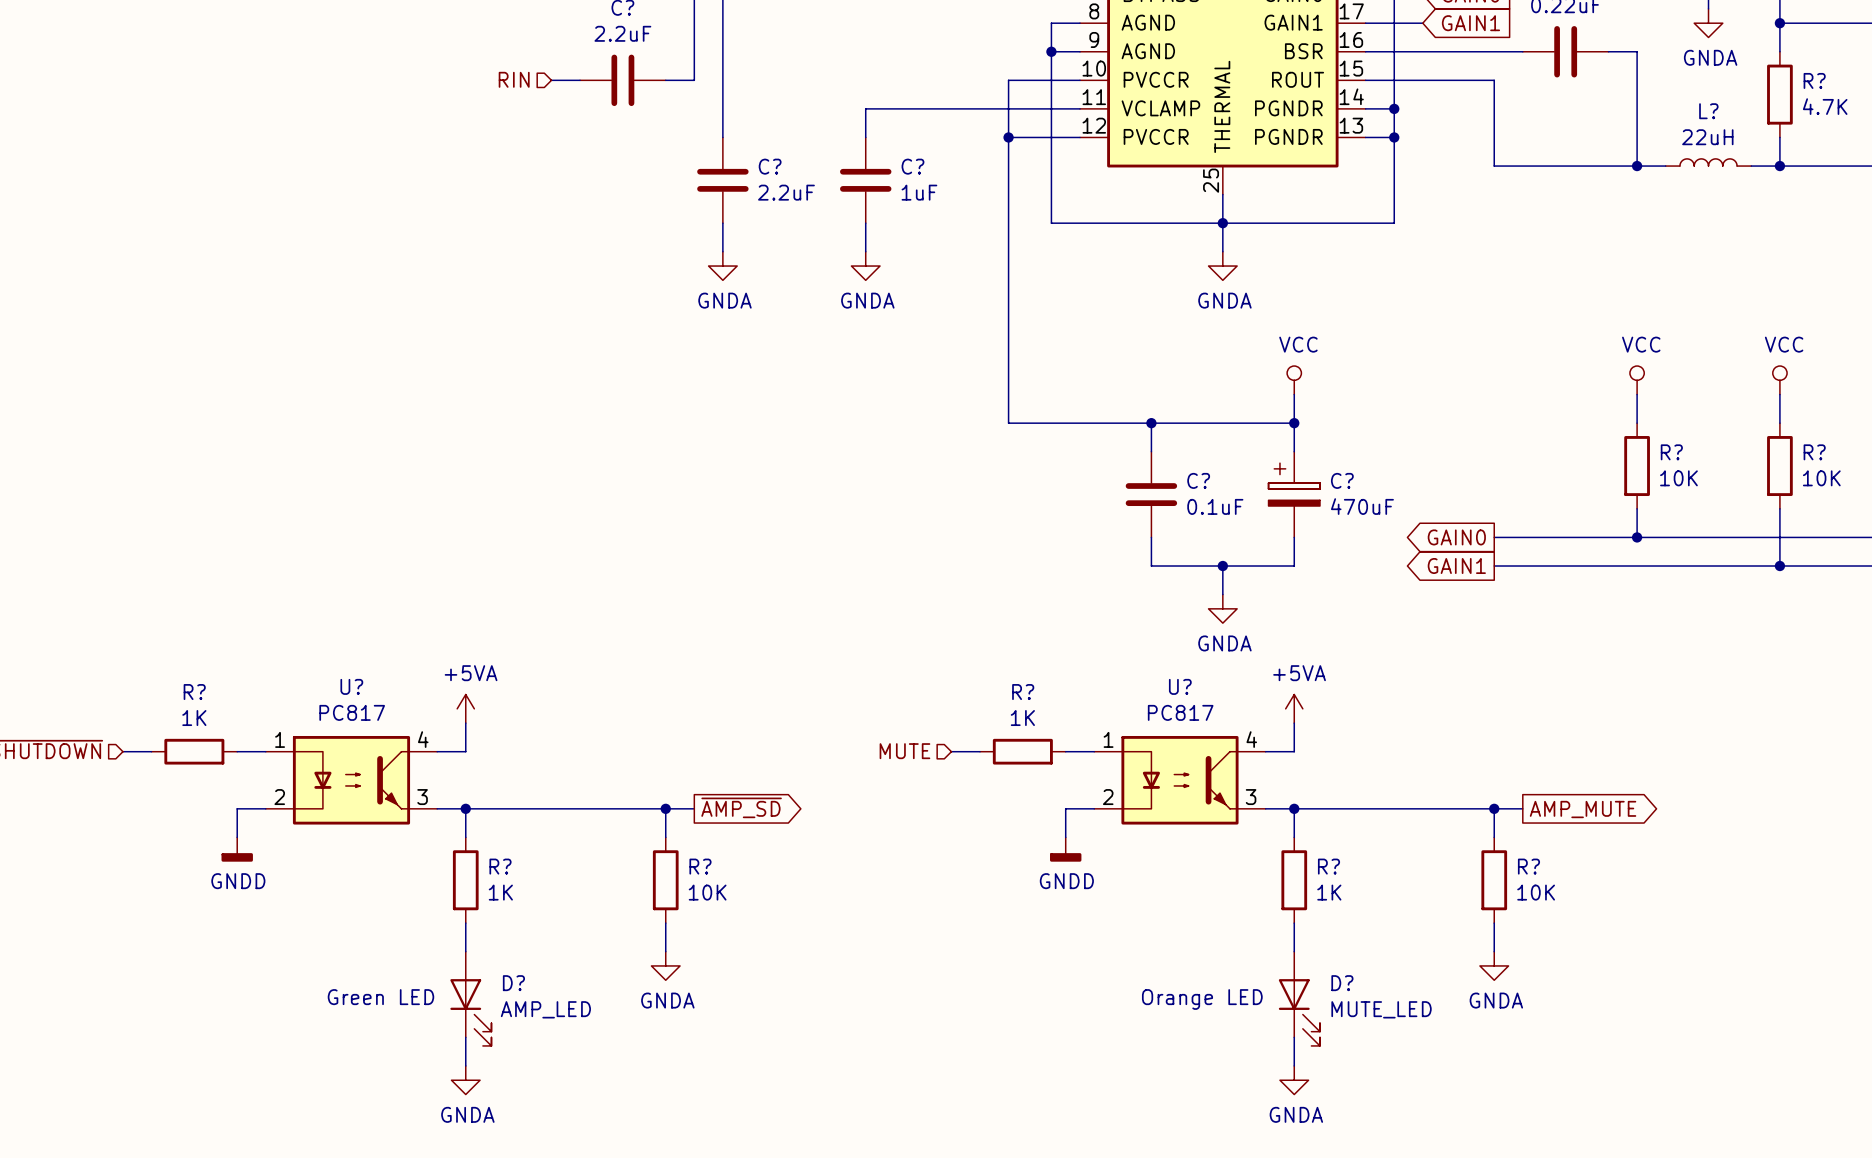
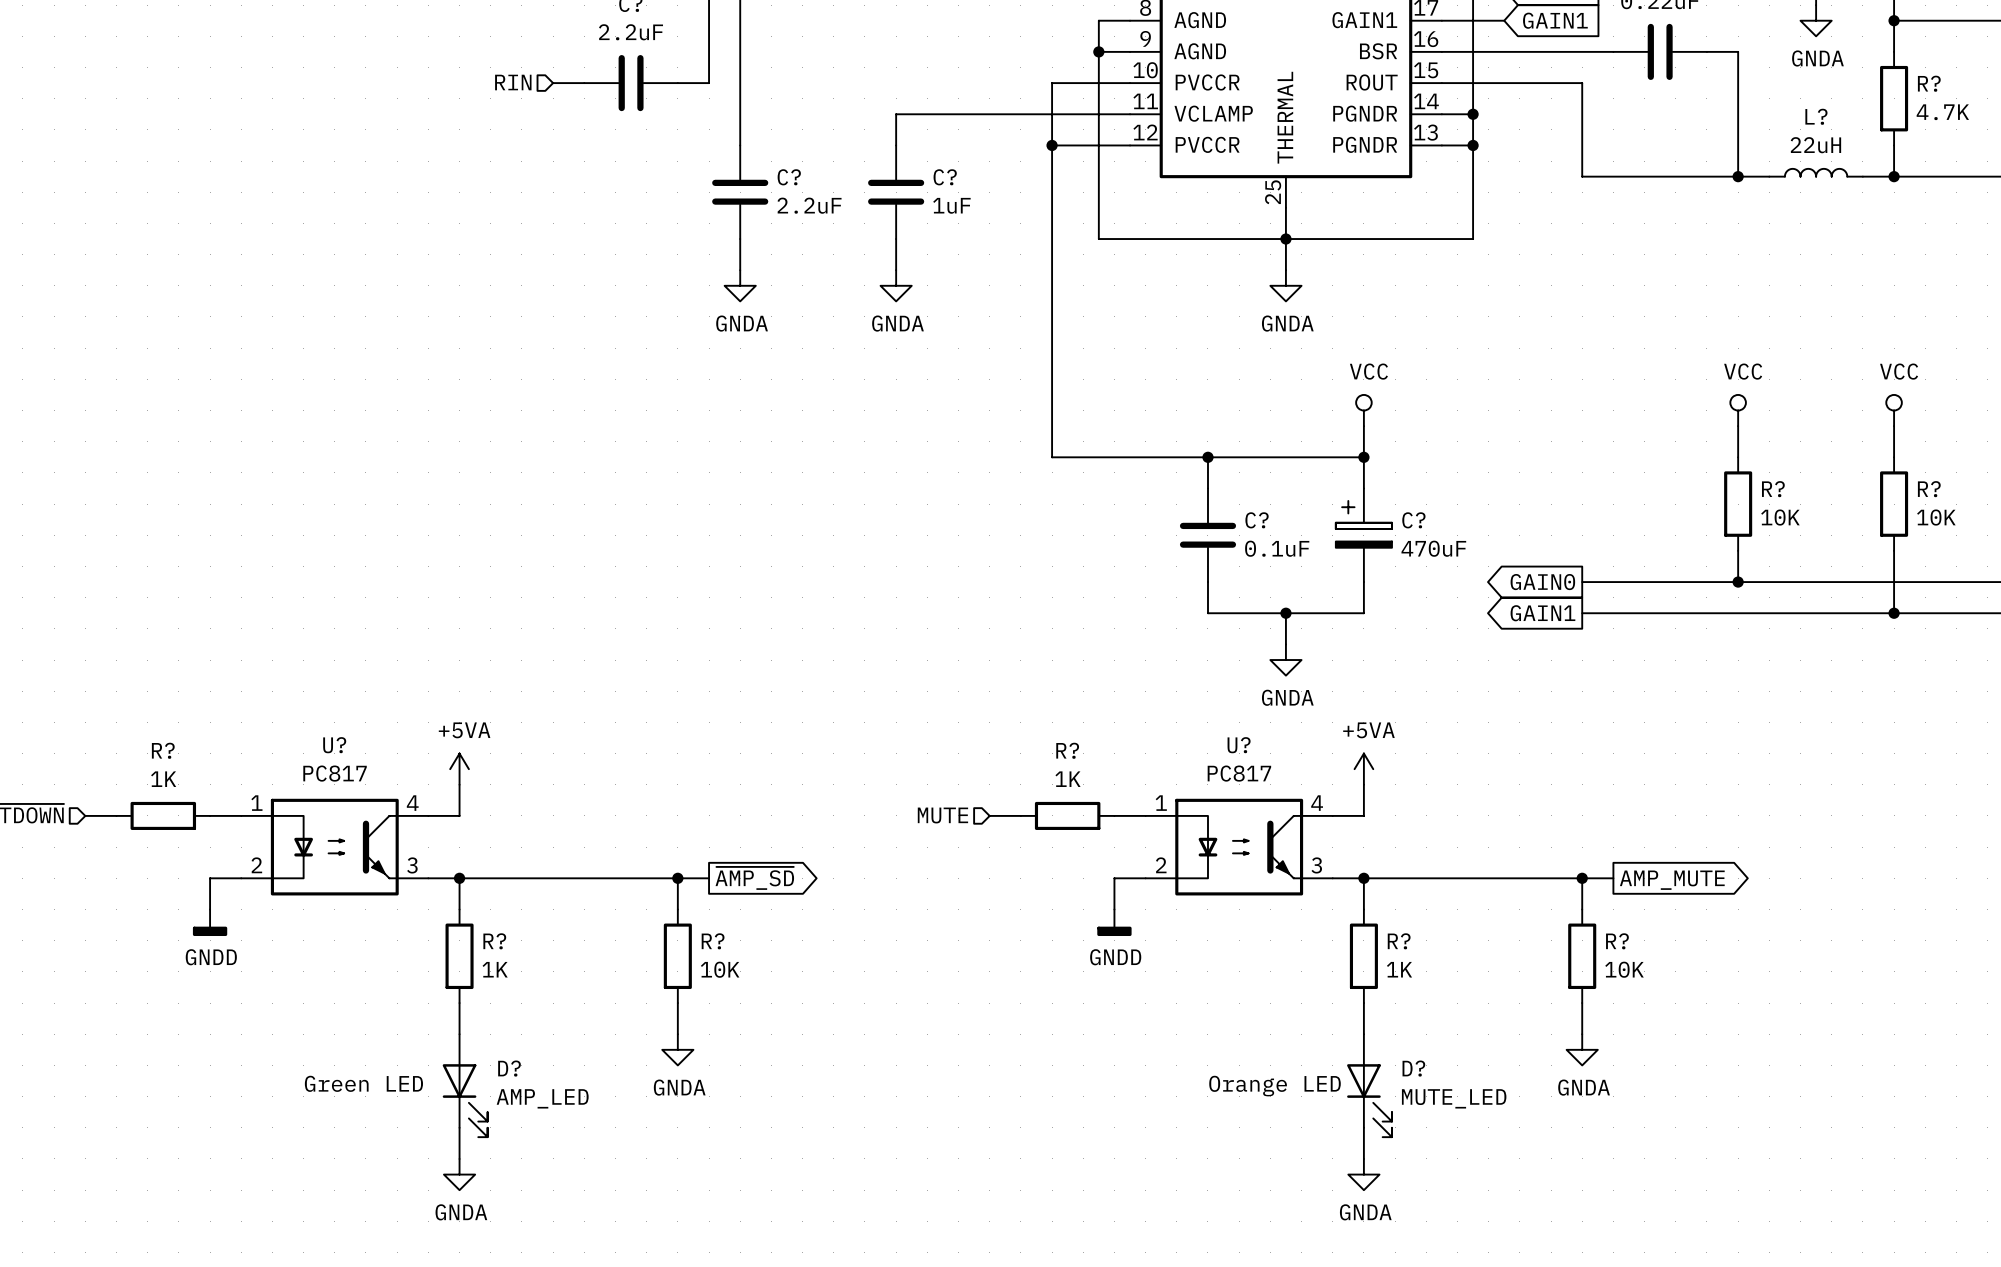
text position: Green LED (380, 997) -> Green LED (363, 1083)
text position: Orange LED (1202, 999) -> Orange LED (1275, 1086)

